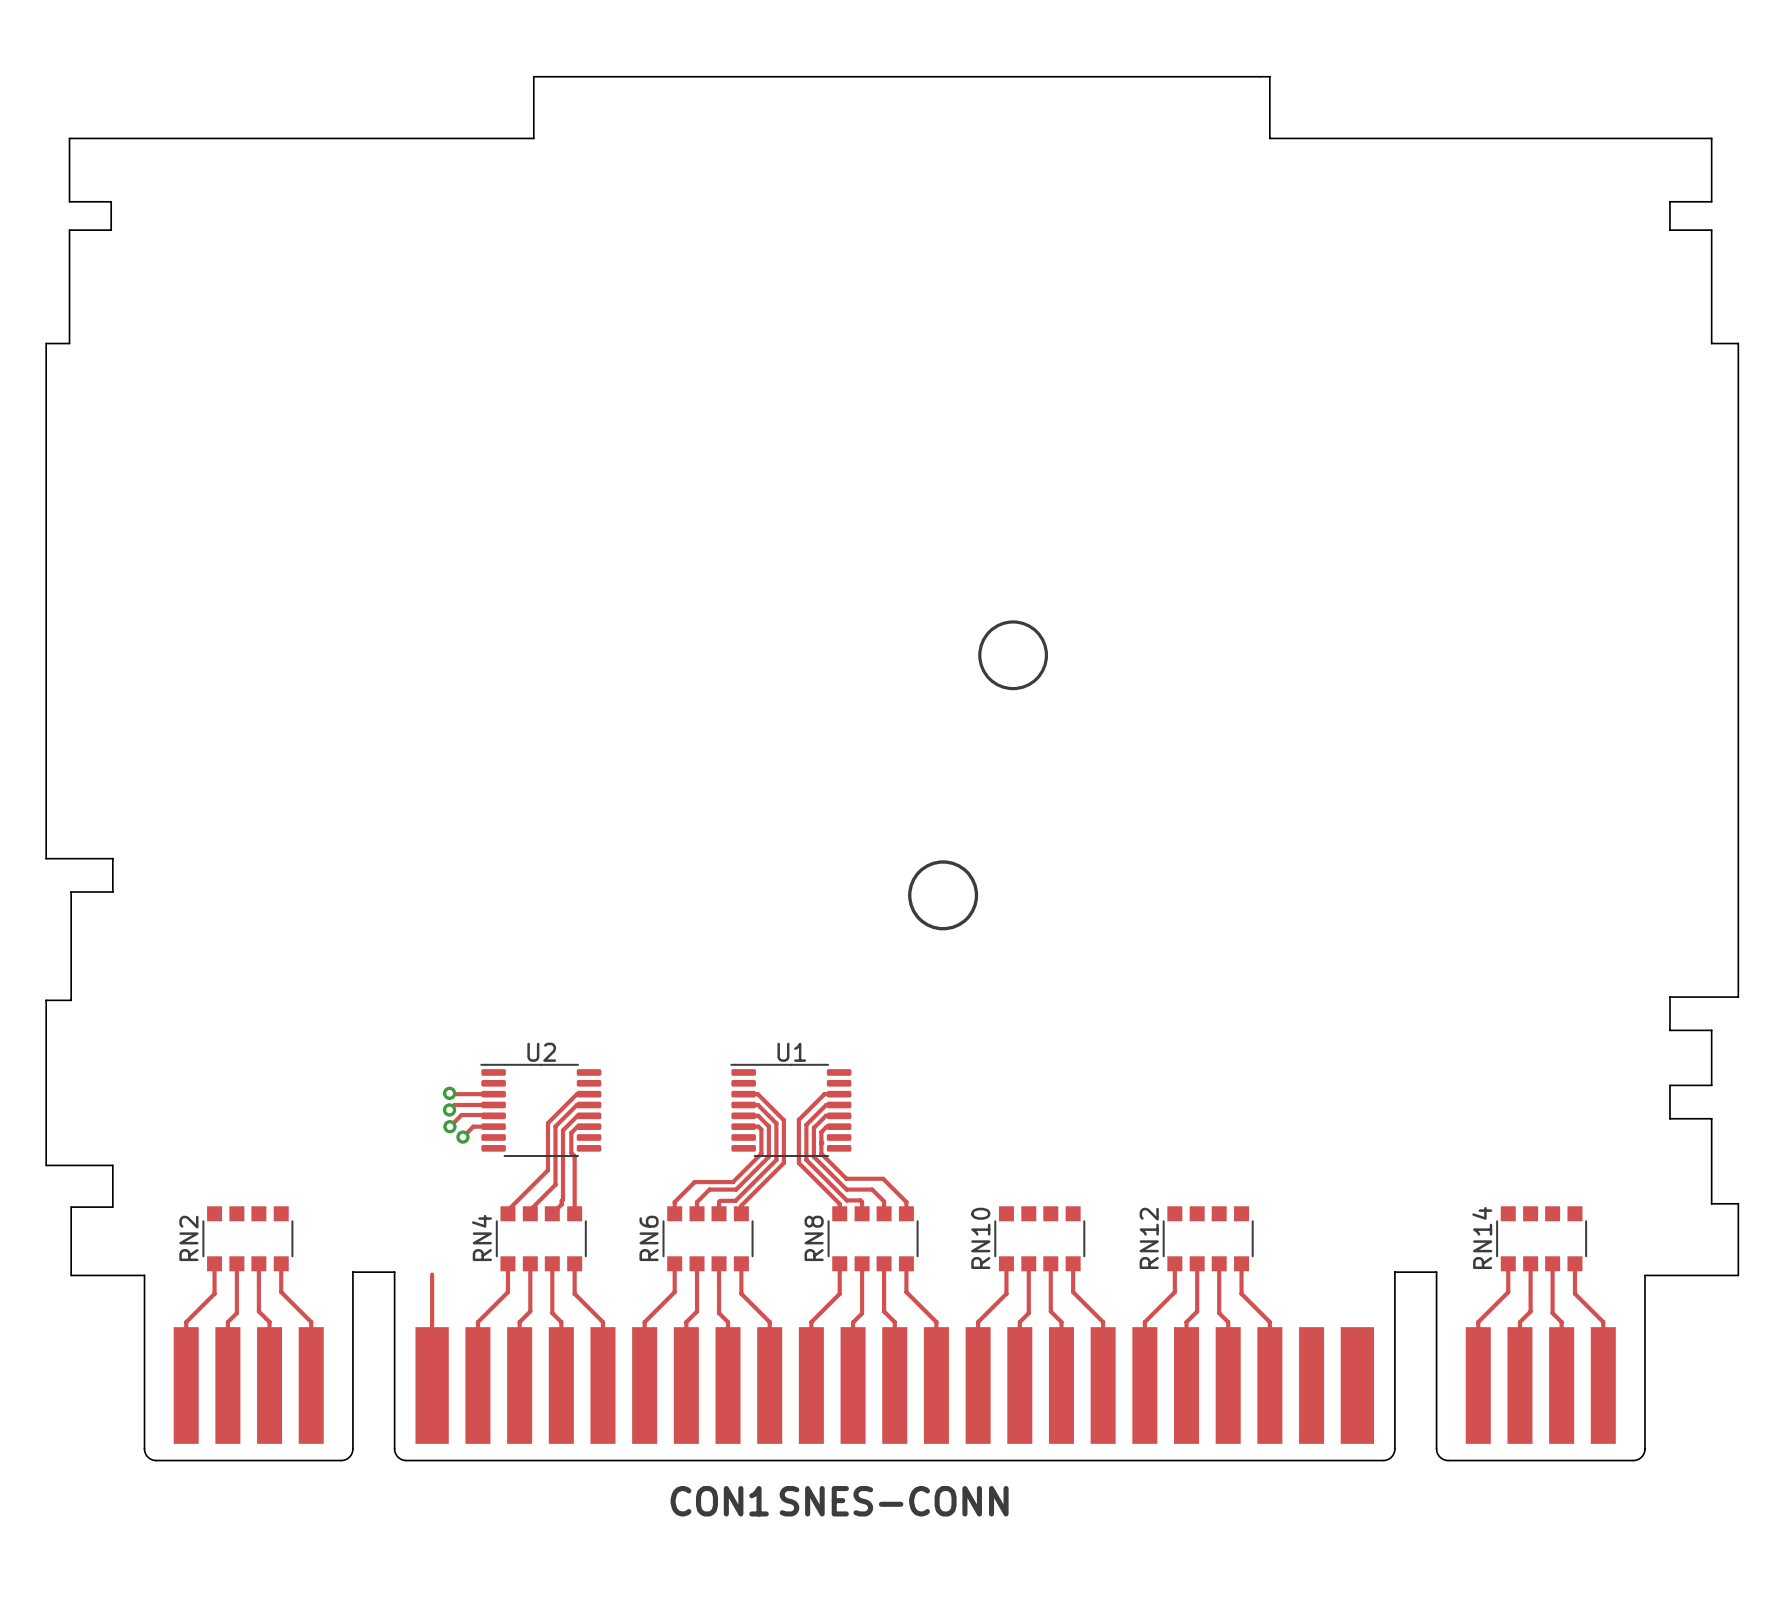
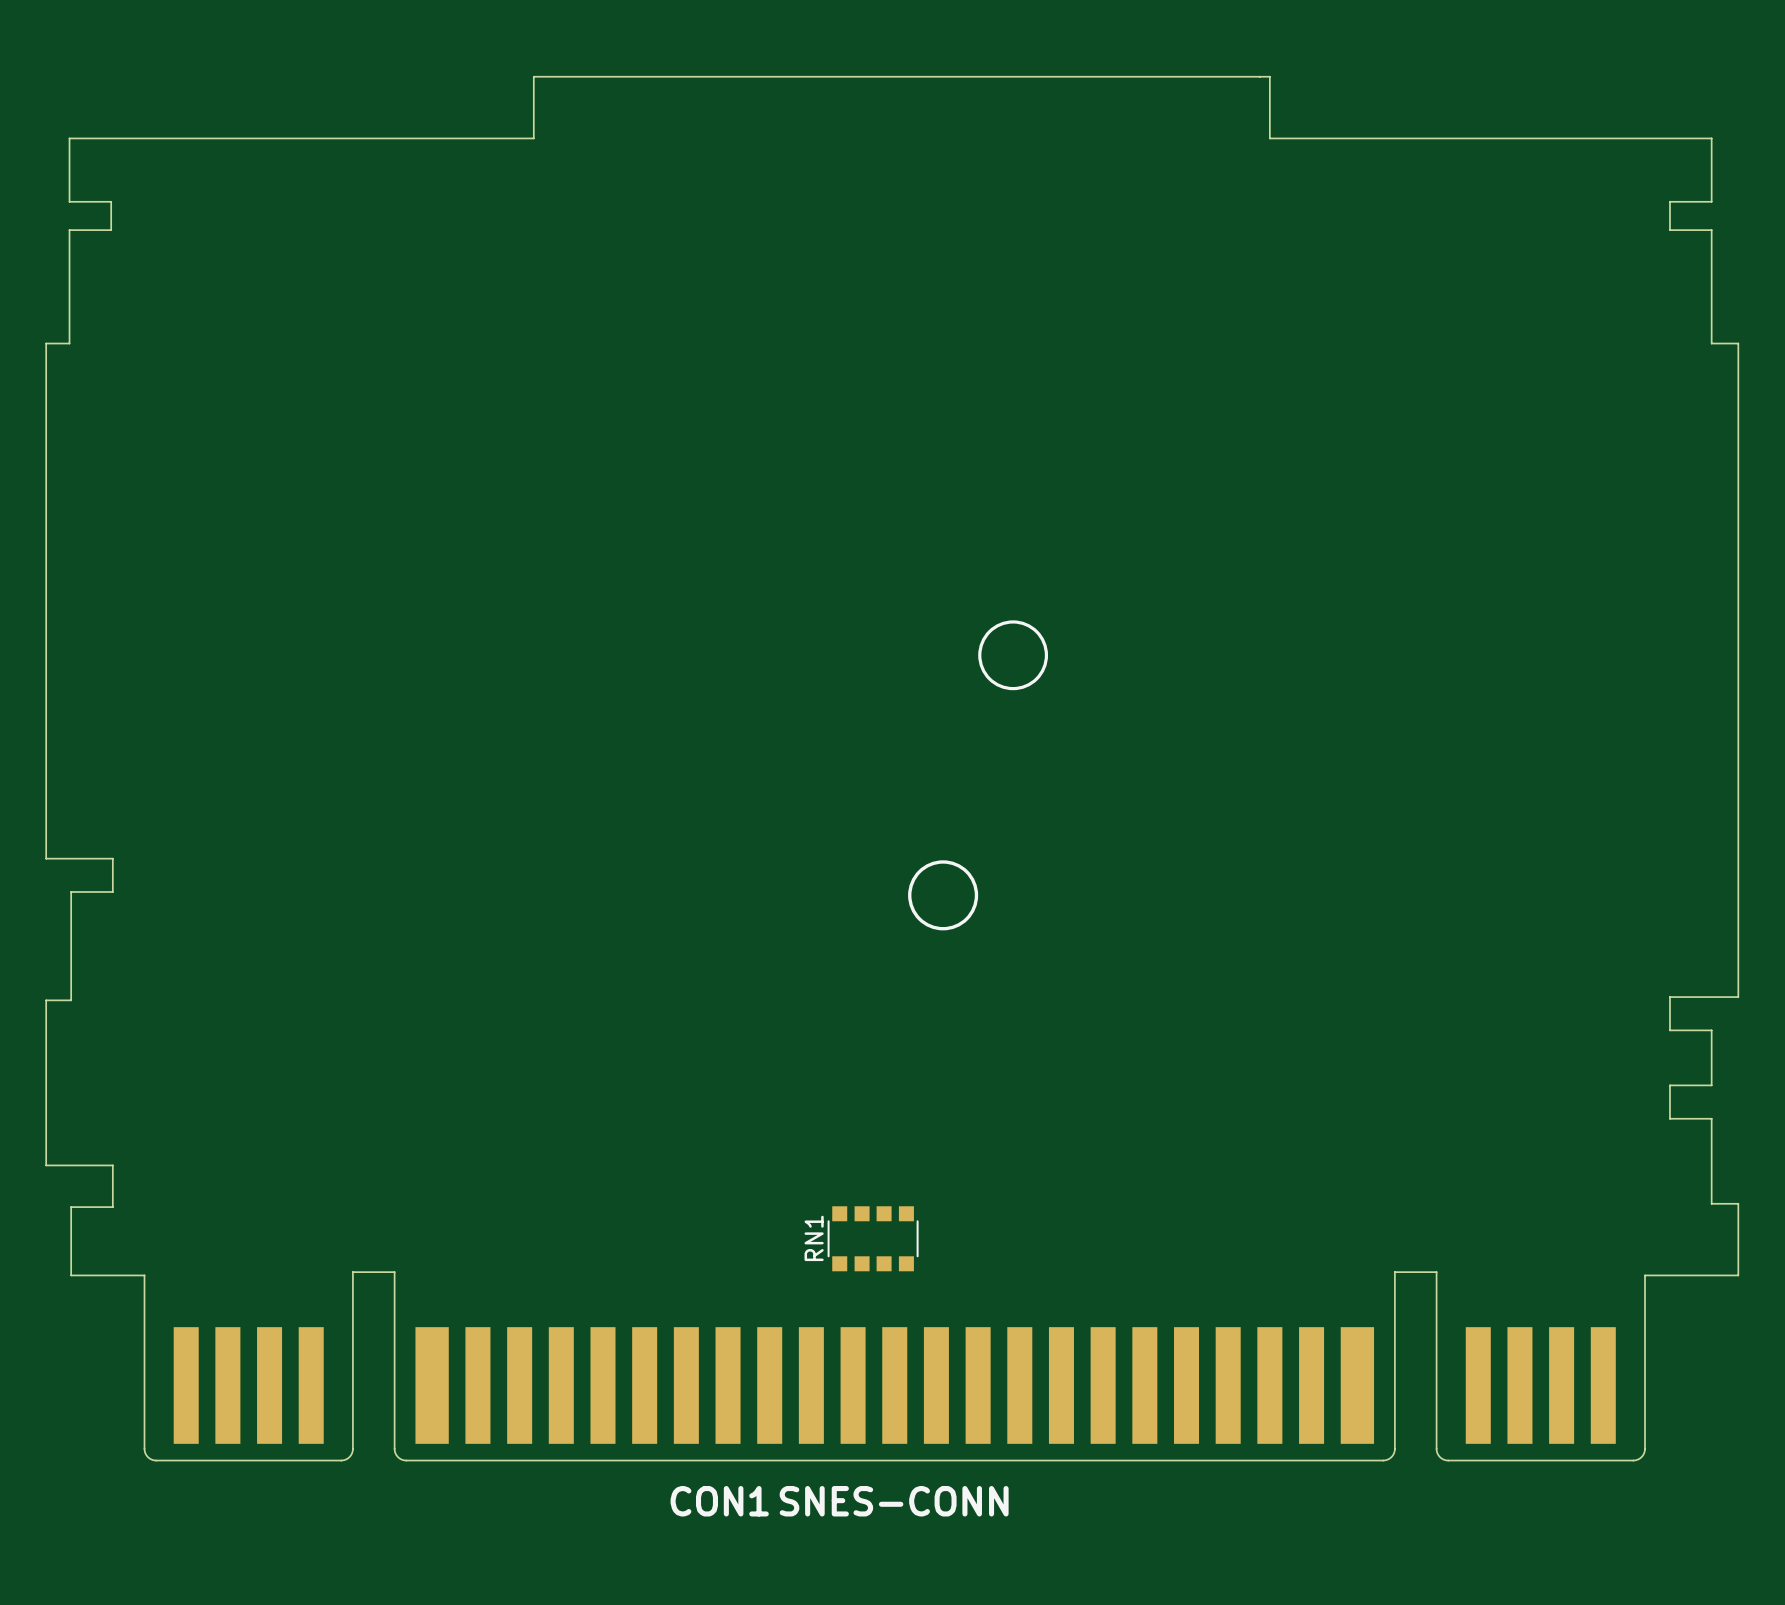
track: (449, 1093) (493, 1094) -> none
via: (449, 1093) -> none
track: (589, 1094) (576, 1094) (547, 1123) (547, 1170) (507, 1210) (507, 1213) -> none
track: (743, 1094) (757, 1094) (783, 1120) (783, 1163) (741, 1205) (741, 1213) -> none
track: (839, 1094) (824, 1094) (798, 1119) (798, 1163) (839, 1203) (839, 1213) -> none
track: (493, 1104) (454, 1104) (449, 1109) -> none
track: (589, 1104) (576, 1104) (555, 1126) (555, 1184) (530, 1209) (530, 1213) -> none
track: (743, 1104) (758, 1104) (776, 1123) (776, 1159) (735, 1200) (720, 1200) (719, 1213) -> none
track: (839, 1104) (826, 1104) (806, 1124) (806, 1159) (846, 1200) (860, 1200) (862, 1213) -> none
via: (449, 1109) -> none
U2: (540, 1110) -> none
U1: (790, 1110) -> none
track: (493, 1115) (461, 1115) (449, 1126) -> none
track: (577, 1115) (562, 1130) (562, 1199) (561, 1204) (552, 1213) -> none
track: (743, 1115) (758, 1115) (768, 1126) (768, 1156) (736, 1189) (709, 1189) (697, 1202) (697, 1213) -> none
track: (839, 1115) (825, 1115) (813, 1127) (813, 1156) (846, 1189) (872, 1189) (884, 1201) (884, 1213) -> none
via: (449, 1126) -> none
track: (493, 1126) (473, 1126) (462, 1137) -> none
track: (589, 1126) (577, 1126) (571, 1132) (571, 1152) (574, 1156) (574, 1213) -> none
track: (743, 1126) (758, 1126) (761, 1129) (761, 1153) (733, 1182) (694, 1182) (674, 1202) (674, 1213) -> none
track: (839, 1126) (826, 1126) (821, 1132) (821, 1153) (846, 1178) (883, 1178) (906, 1202) (906, 1213) -> none
via: (462, 1137) -> none
RN2: (247, 1238) -> none
RN4: (541, 1238) -> none
RN6: (708, 1238) -> none
RN8 name: RN8 (814, 1238) -> RN1 (814, 1238)
RN10: (1039, 1238) -> none
RN12: (1208, 1238) -> none
RN14: (1541, 1238) -> none
track: (214, 1263) (214, 1293) (186, 1322) (186, 1385) -> none
track: (236, 1263) (236, 1313) (227, 1322) (227, 1385) -> none
track: (258, 1263) (258, 1311) (269, 1322) (269, 1385) -> none
track: (281, 1263) (281, 1292) (311, 1322) (311, 1385) -> none
track: (507, 1263) (507, 1292) (477, 1322) (477, 1385) -> none
track: (530, 1263) (530, 1311) (519, 1322) (519, 1385) -> none
track: (552, 1263) (552, 1313) (561, 1322) (561, 1385) -> none
track: (574, 1263) (574, 1293) (602, 1322) (602, 1385) -> none
track: (674, 1263) (674, 1292) (644, 1322) (644, 1385) -> none
track: (697, 1263) (697, 1311) (686, 1322) (686, 1385) -> none
track: (719, 1263) (719, 1313) (728, 1322) (728, 1385) -> none
track: (741, 1263) (741, 1293) (769, 1322) (769, 1385) -> none
track: (839, 1263) (839, 1293) (811, 1322) (811, 1385) -> none
track: (862, 1263) (862, 1313) (853, 1322) (853, 1385) -> none
track: (884, 1263) (884, 1311) (894, 1322) (894, 1385) -> none
track: (906, 1263) (906, 1292) (936, 1322) (936, 1385) -> none
track: (1006, 1263) (1006, 1293) (978, 1322) (978, 1385) -> none
track: (1028, 1263) (1028, 1313) (1019, 1322) (1019, 1385) -> none
track: (1050, 1263) (1050, 1311) (1061, 1322) (1061, 1385) -> none
track: (1073, 1263) (1073, 1292) (1103, 1322) (1103, 1385) -> none
track: (1174, 1263) (1174, 1292) (1144, 1322) (1144, 1385) -> none
track: (1197, 1263) (1197, 1311) (1186, 1322) (1186, 1385) -> none
track: (1219, 1263) (1219, 1313) (1228, 1322) (1228, 1385) -> none
track: (1241, 1263) (1241, 1293) (1269, 1322) (1269, 1385) -> none
track: (1508, 1263) (1508, 1292) (1478, 1322) (1478, 1385) -> none
track: (1530, 1263) (1530, 1311) (1519, 1322) (1519, 1385) -> none
track: (1552, 1263) (1552, 1313) (1561, 1322) (1561, 1385) -> none
track: (1574, 1263) (1574, 1293) (1603, 1322) (1603, 1385) -> none
track: (432, 1274) (432, 1385) -> none

